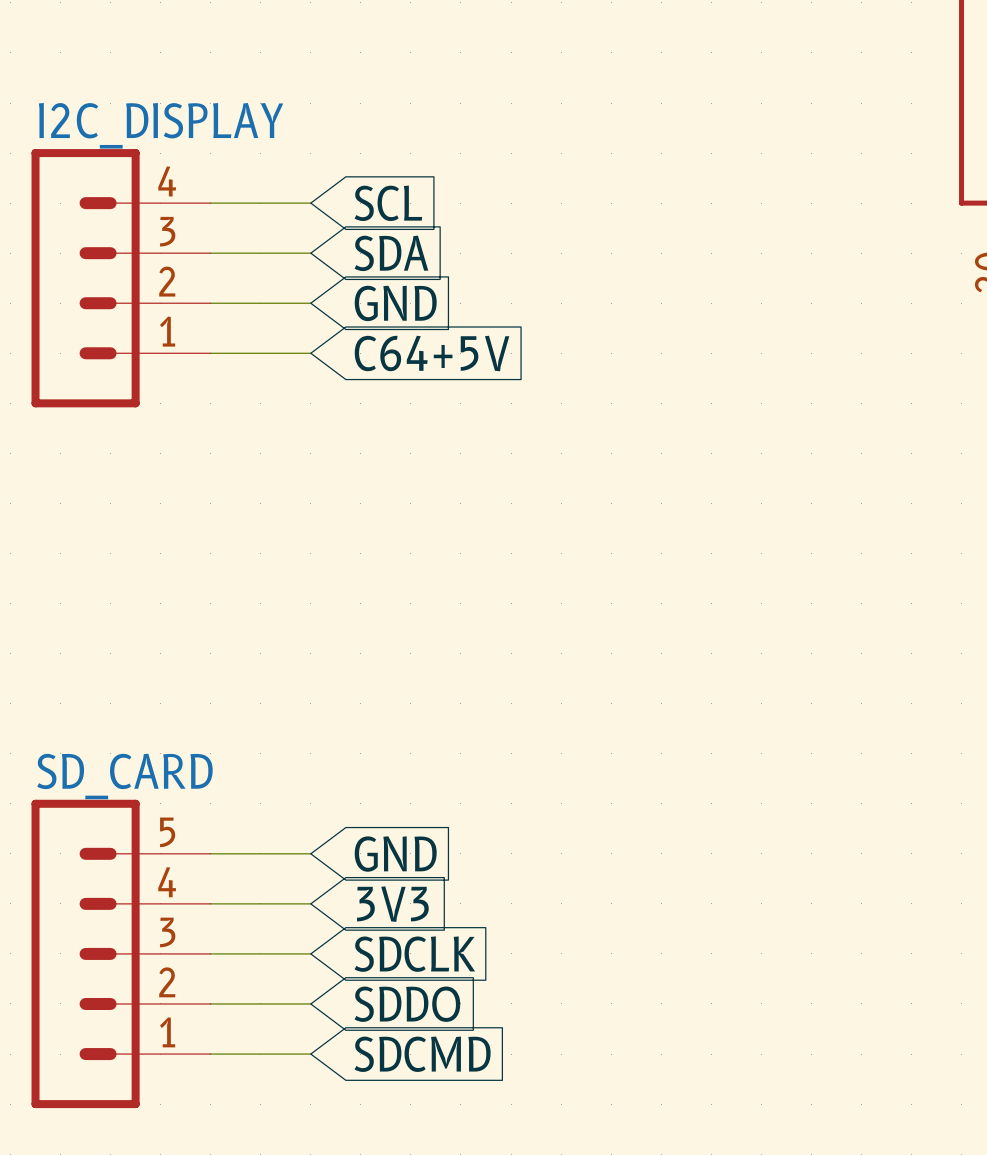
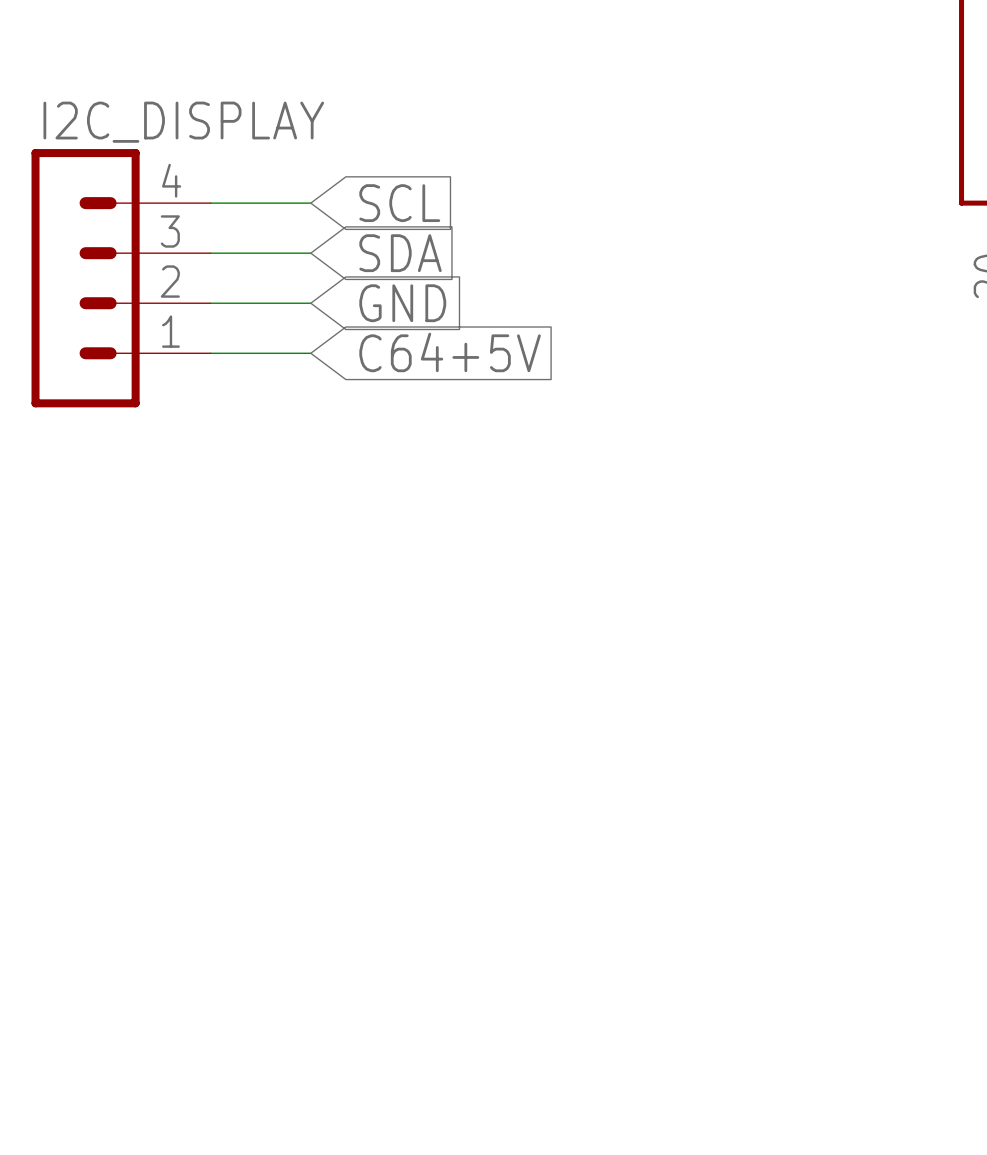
wire: (210, 853) (310, 853) -> none
global label: GND (395, 854) -> none
wire: (210, 903) (310, 903) -> none
global label: 3V3 (392, 904) -> none
SD_CARD: (121, 953) -> none
wire: (210, 953) (310, 953) -> none
global label: SDCLK (414, 954) -> none
wire: (210, 1003) (310, 1003) -> none
global label: SDDO (407, 1004) -> none
wire: (210, 1054) (310, 1054) -> none
global label: SDCMD (422, 1054) -> none

